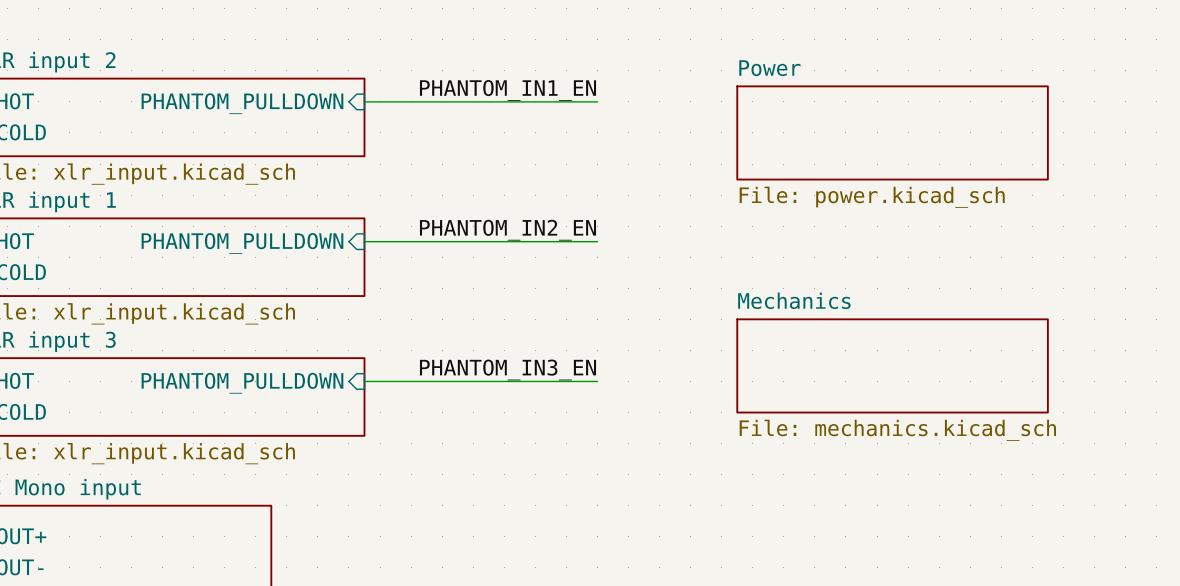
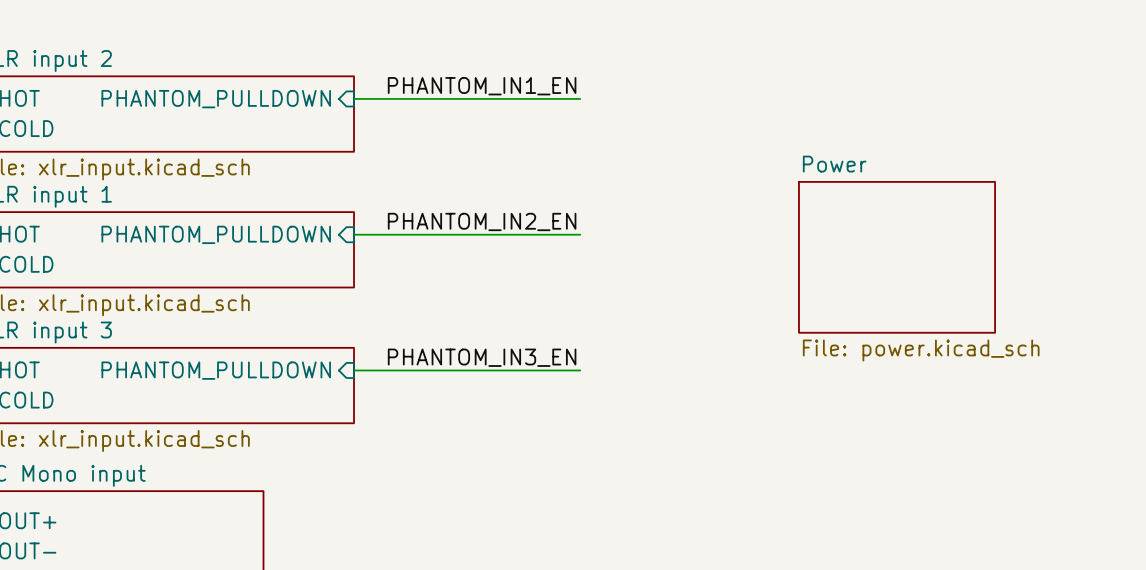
sheet Power: File: power.kicad_sch (892, 132) -> none
sheet Power: none -> File: power.kicad_sch (897, 257)
sheet Mechanics: File: mechanics.kicad_sch (892, 365) -> none

